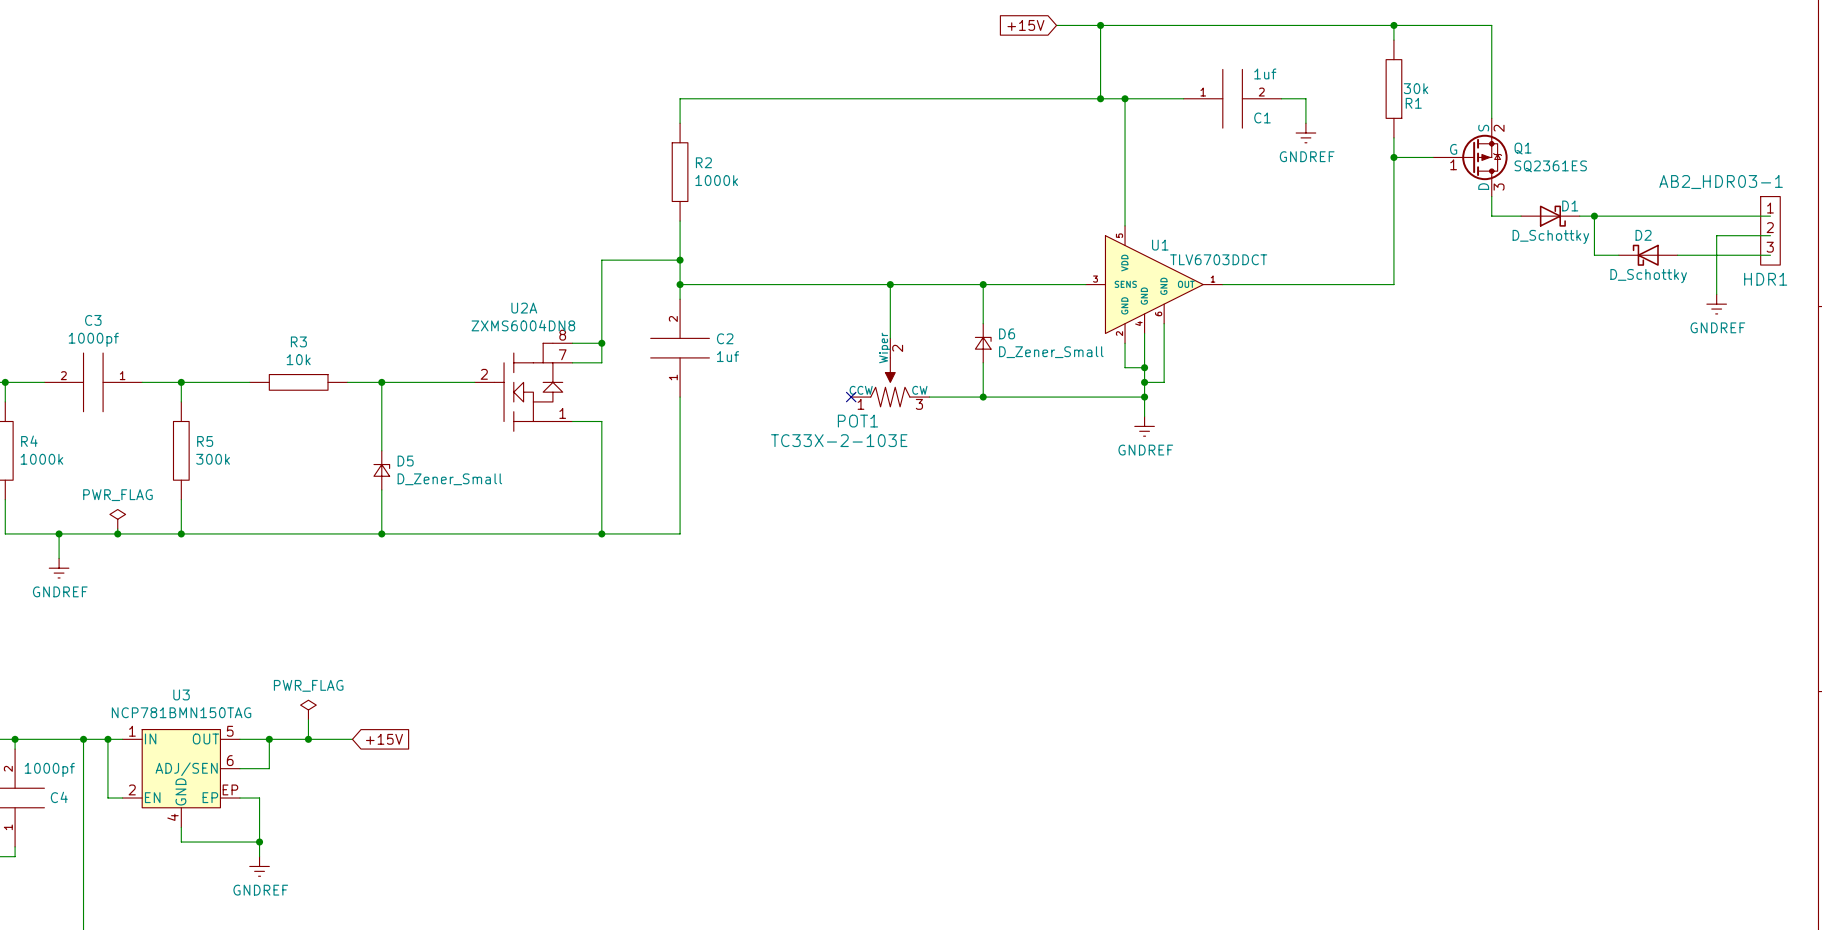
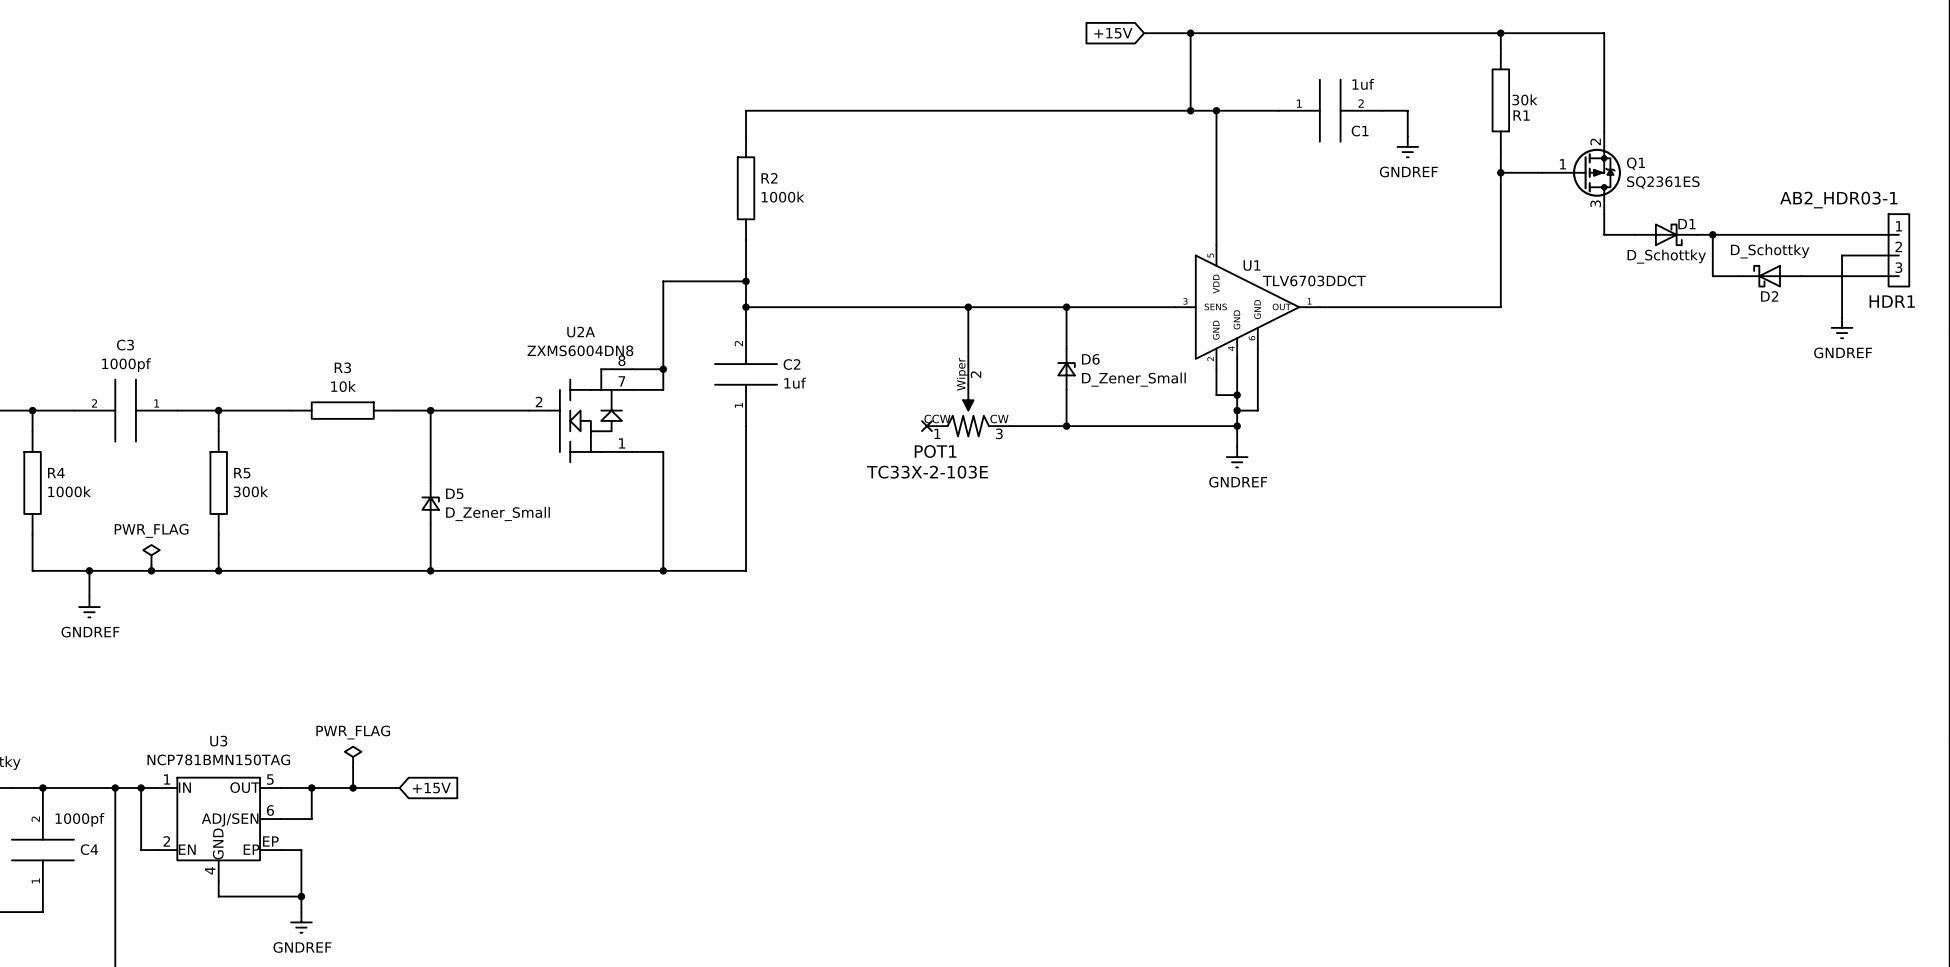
Q1 symbol: [1433, 118, 1508, 197] -> [1542, 131, 1621, 215]
D2 name position: D2 (1643, 235) -> D2 (1769, 296)
D2 value position: D_Schottky (1648, 276) -> D_Schottky (1770, 251)

